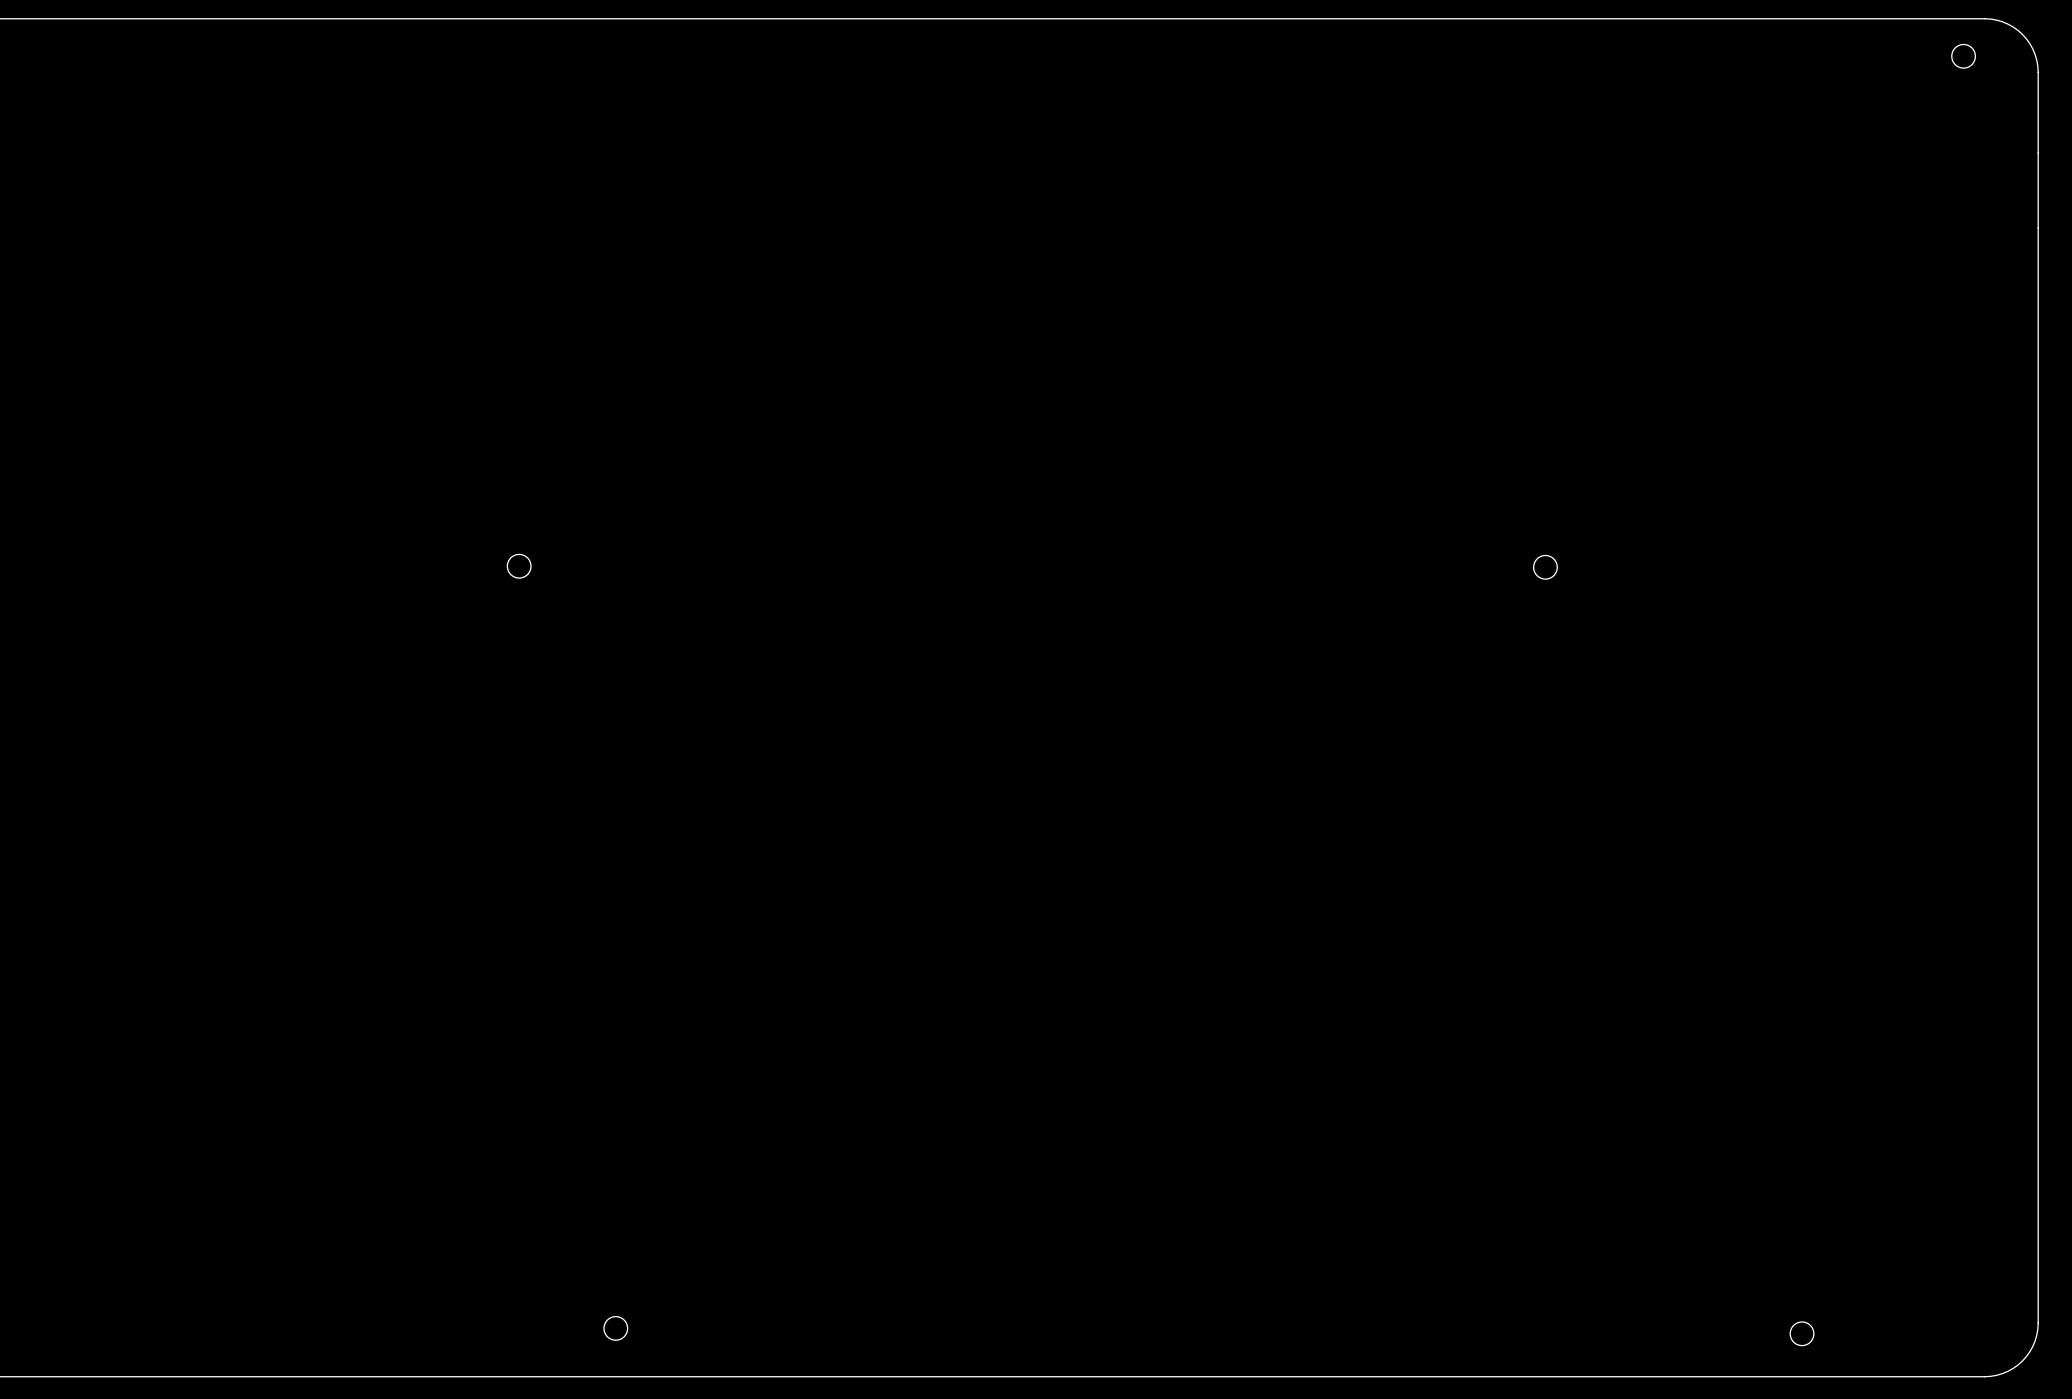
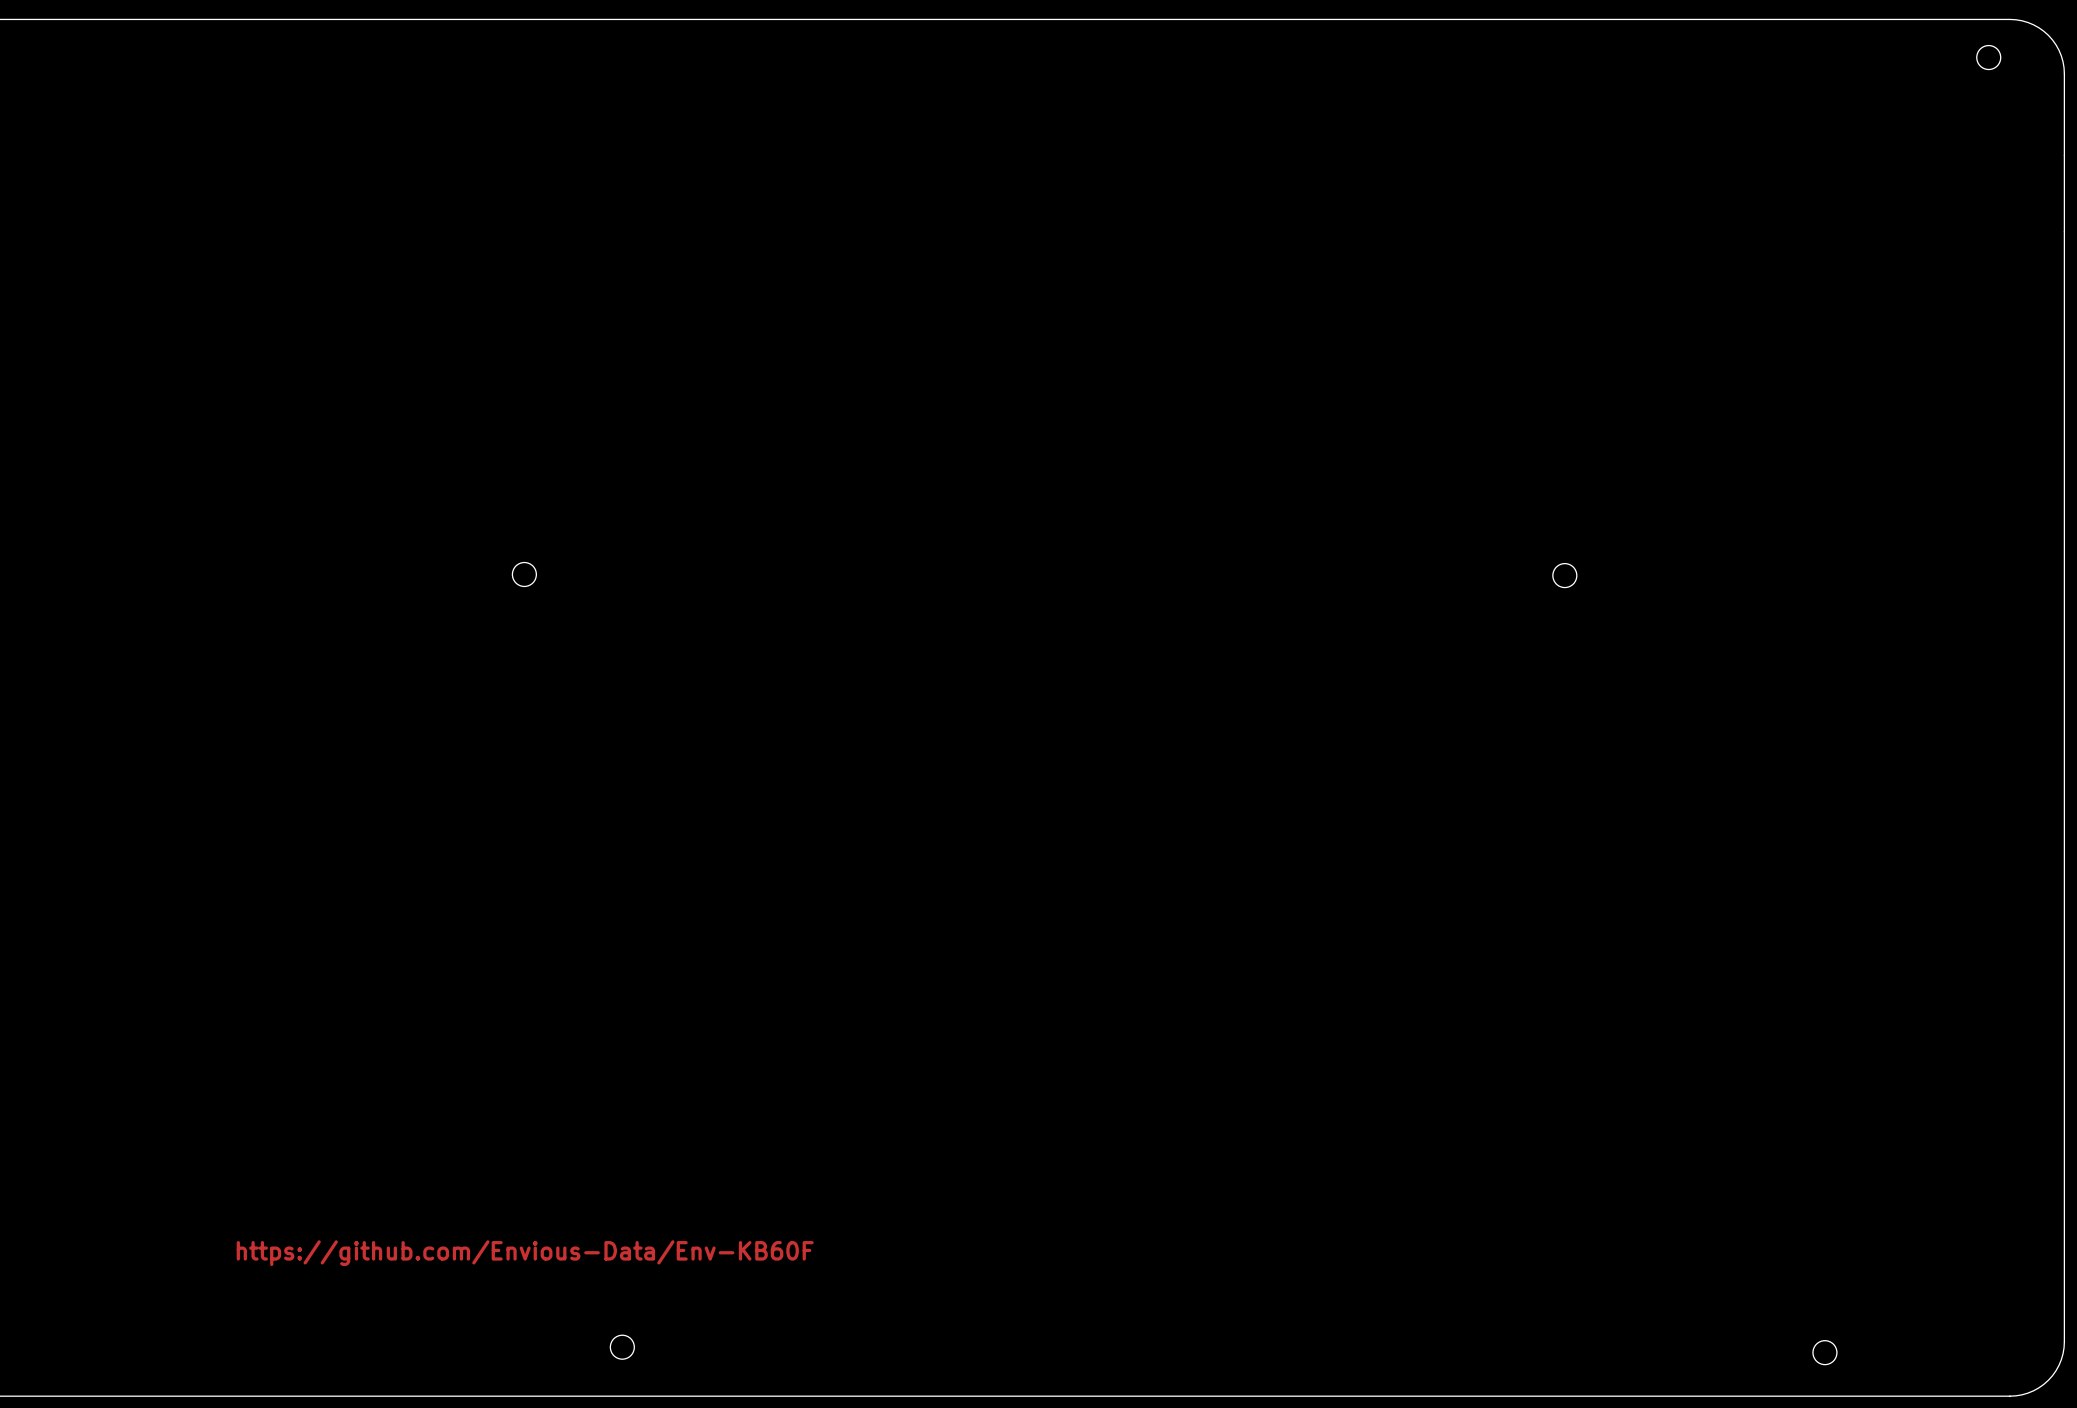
text: none -> https://github.com/Envious-Data/Env-KB60F (525, 1253)

